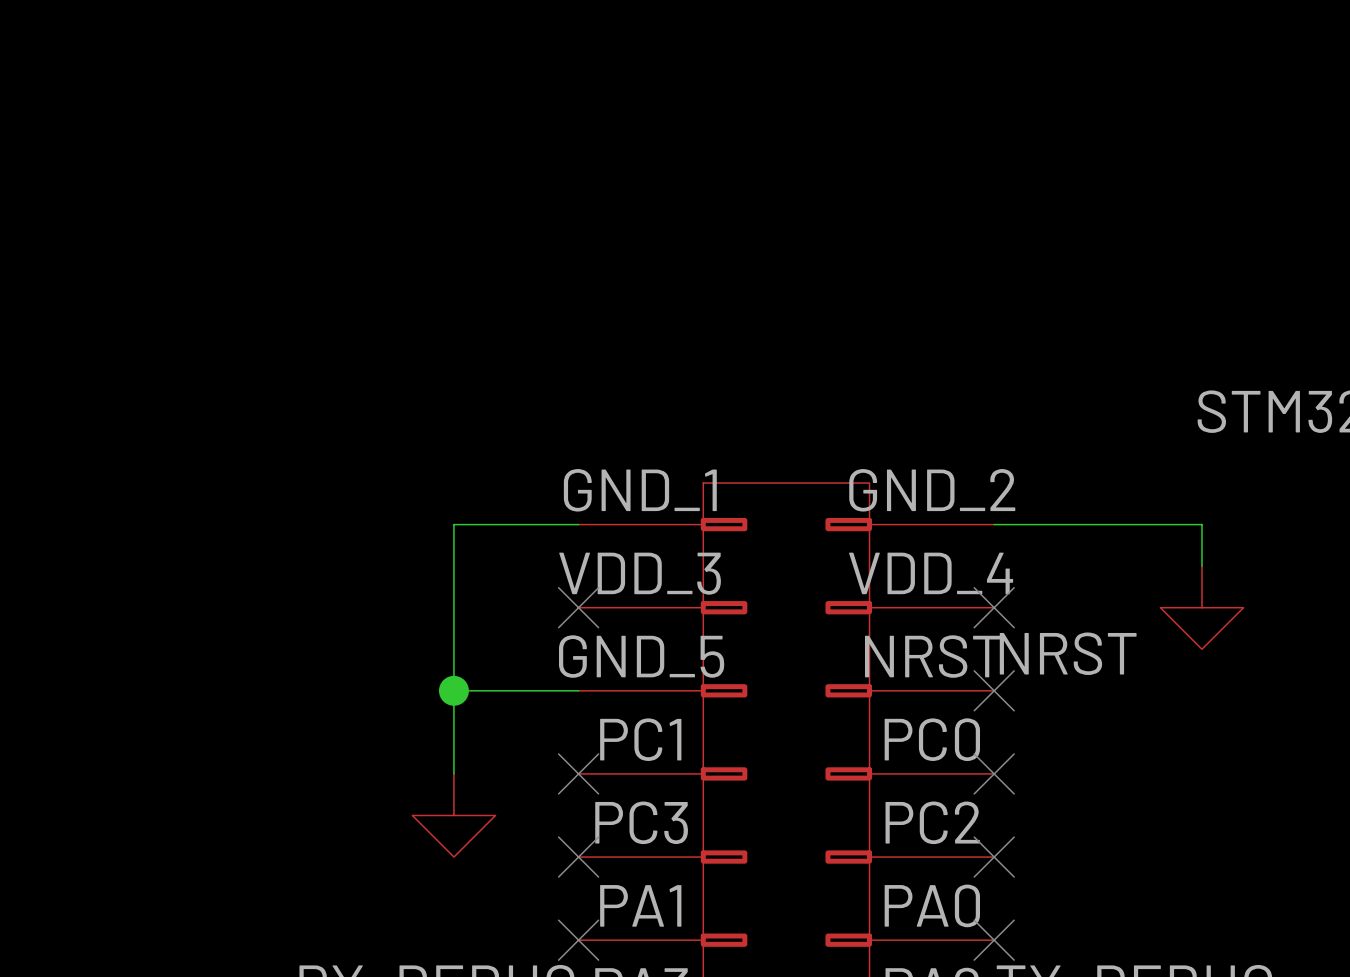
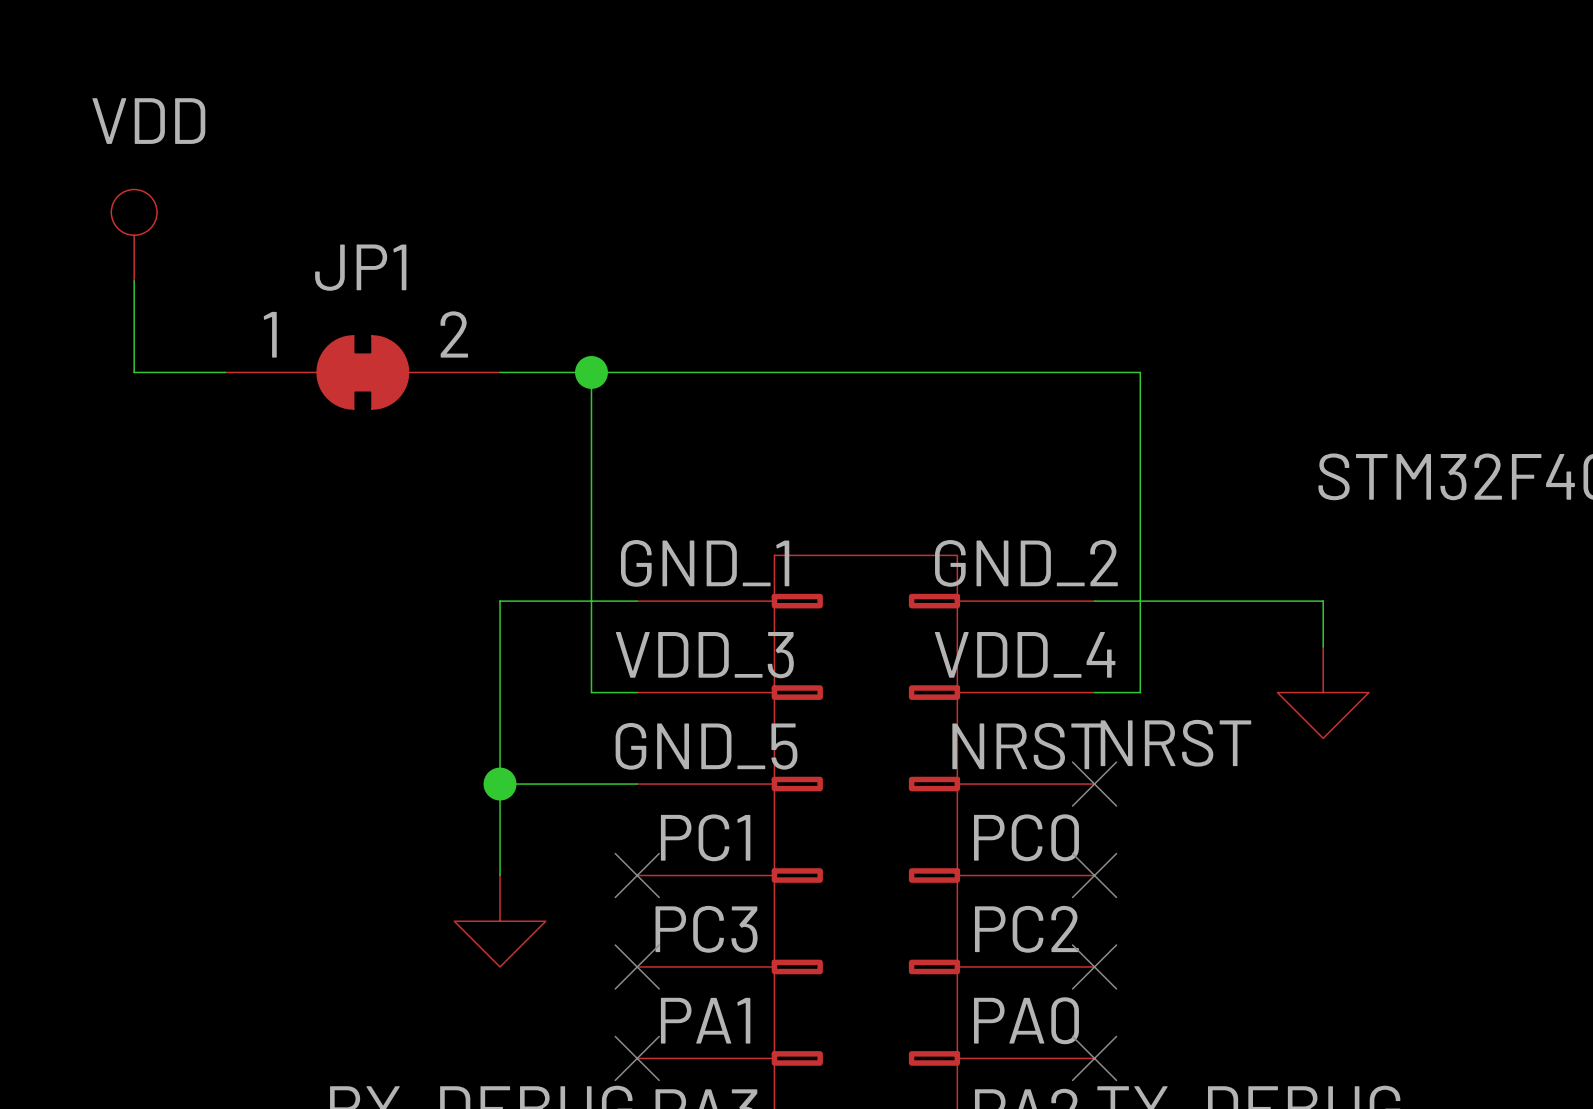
power symbol: none -> VDD (134, 235)
wire: none -> (134, 281) (134, 372) (225, 372)
JP1: none -> (362, 372)
wire: none -> (500, 372) (1140, 372) (1140, 692) (1094, 692)
wire: none -> (591, 372) (591, 692) (637, 692)
junction: none -> (591, 372)
no-connect mark: (578, 607) -> none
no-connect mark: (994, 607) -> none

